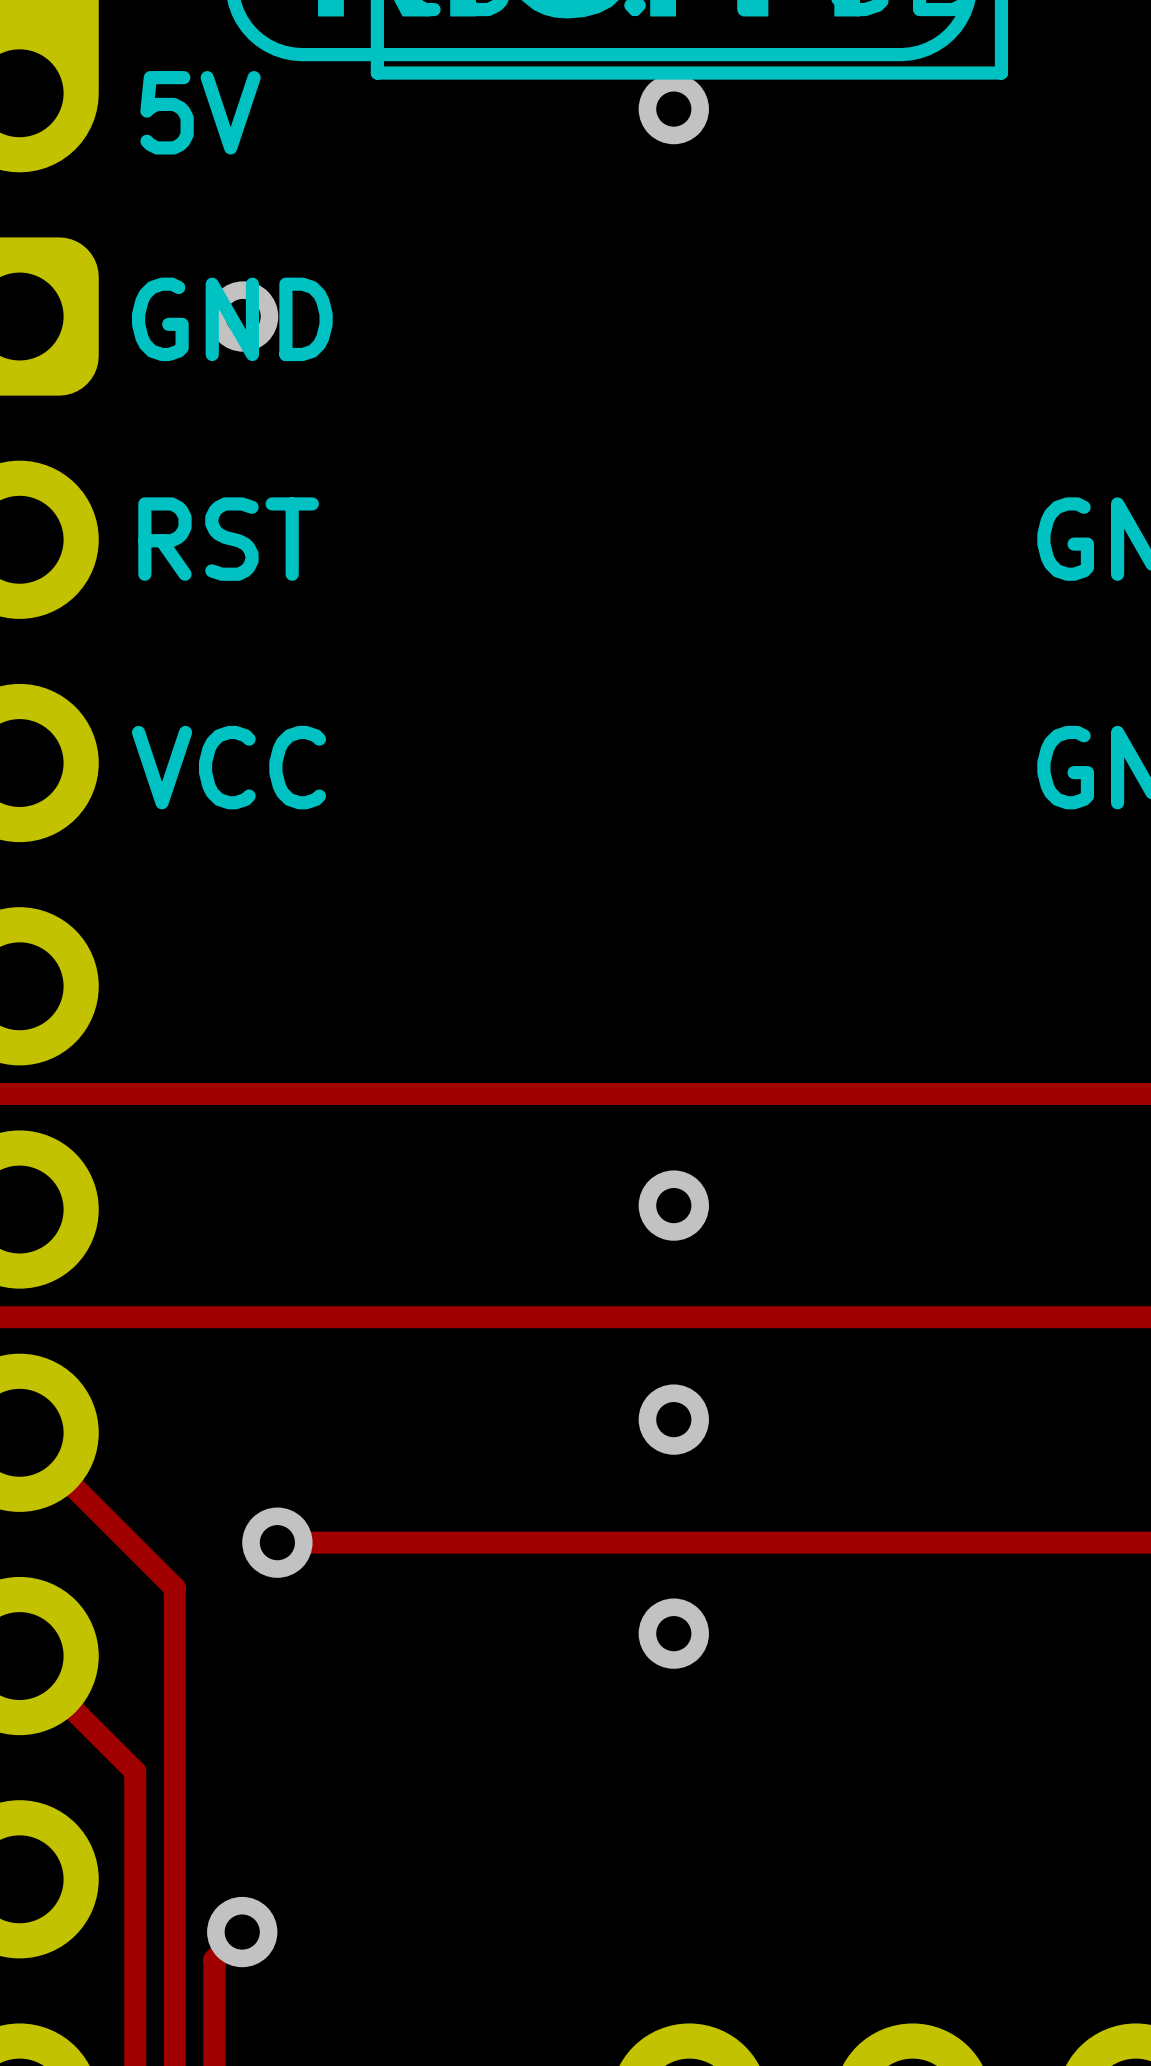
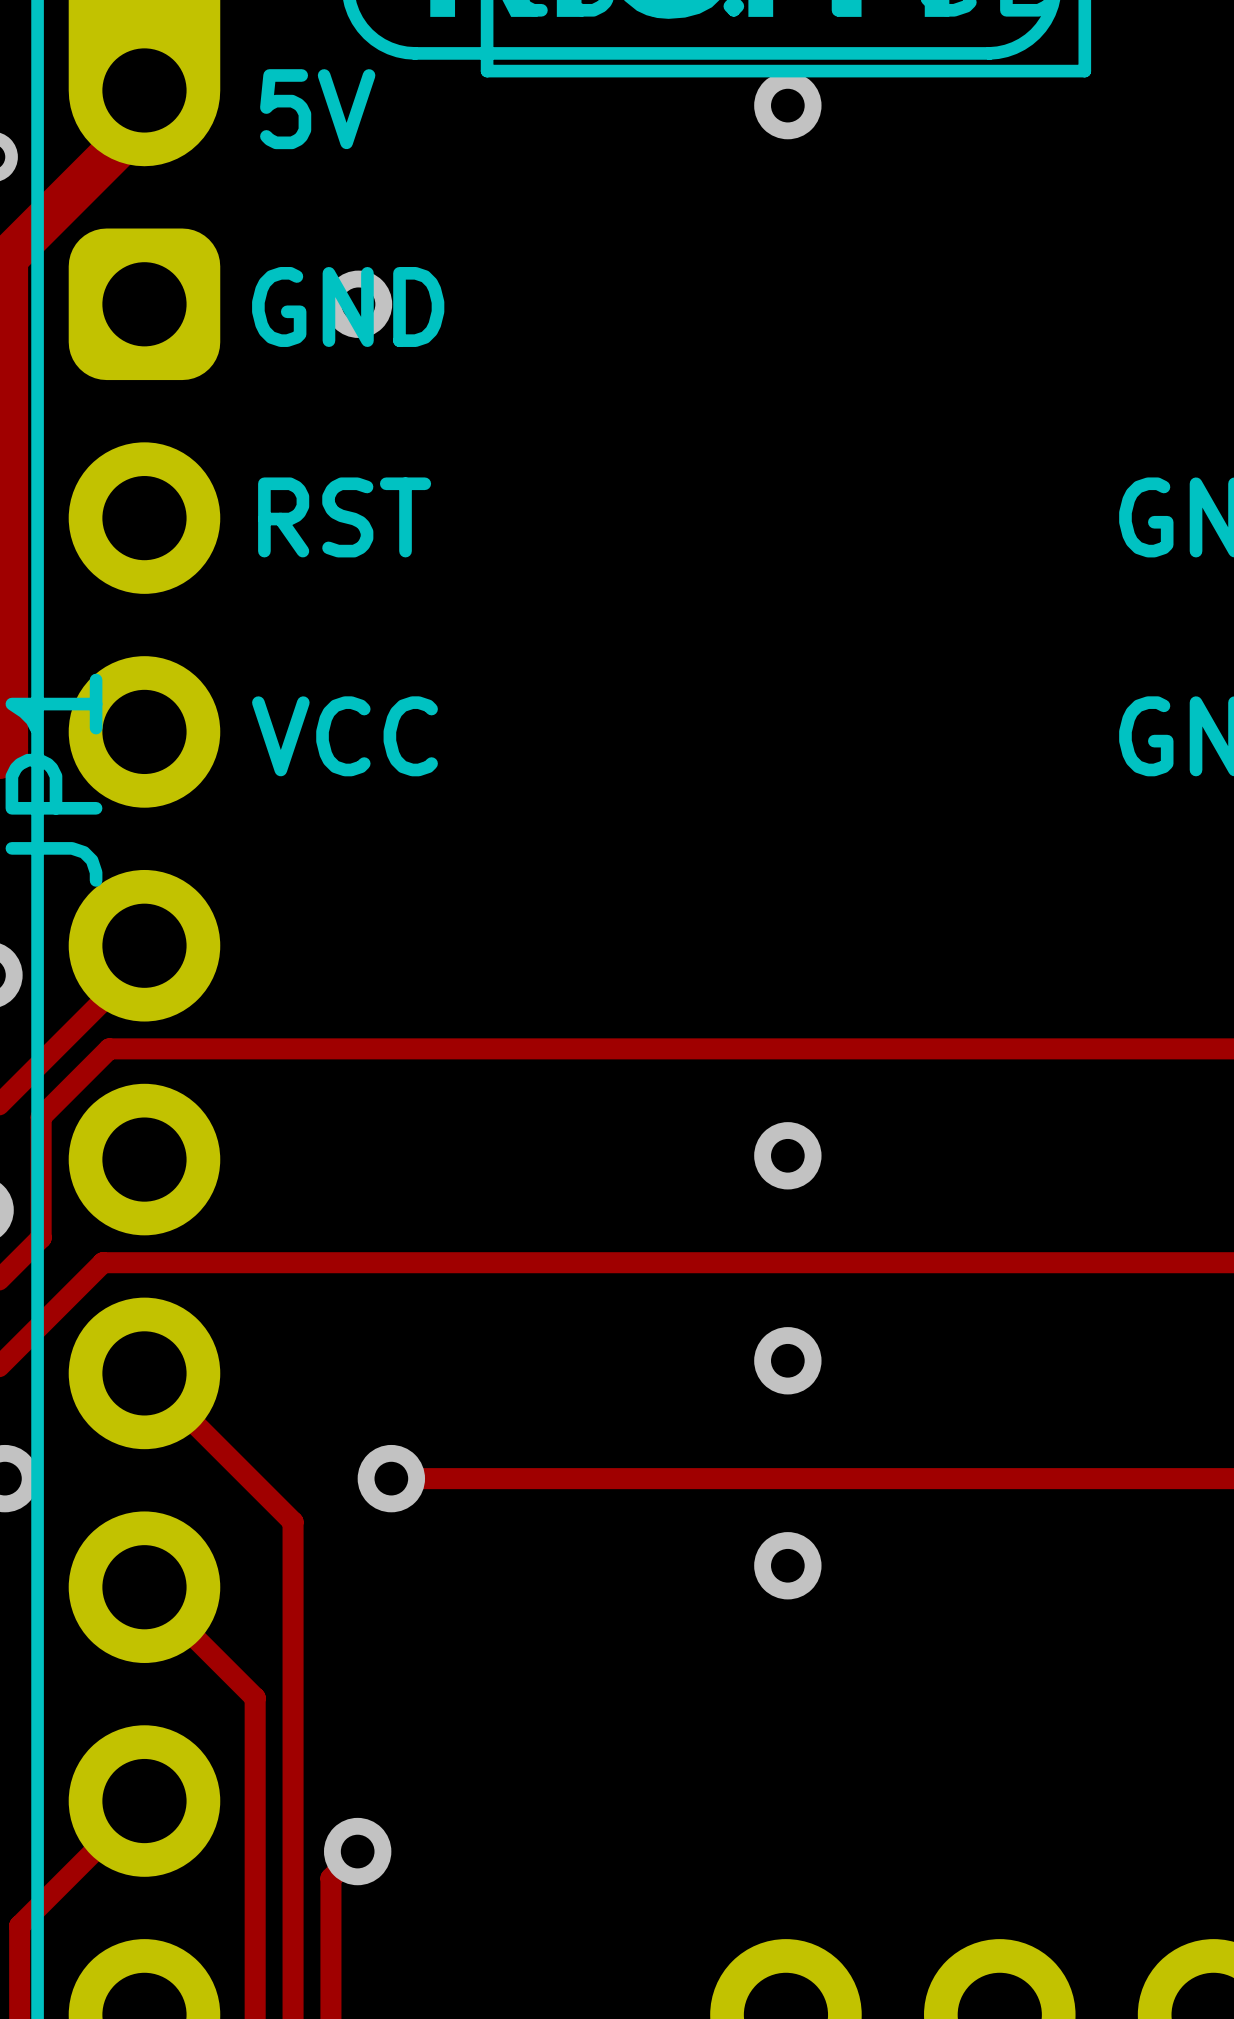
via position: (673, 109) -> (787, 105)
via position: (673, 1205) -> (787, 1155)
via position: (673, 1419) -> (787, 1360)
via position: (673, 1633) -> (787, 1565)

